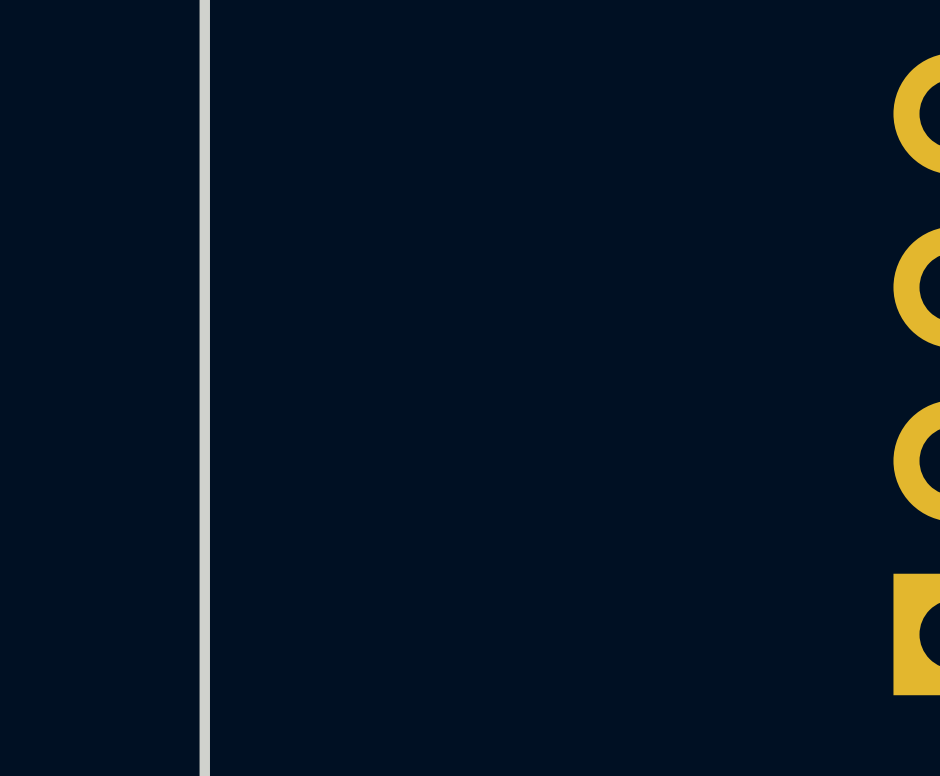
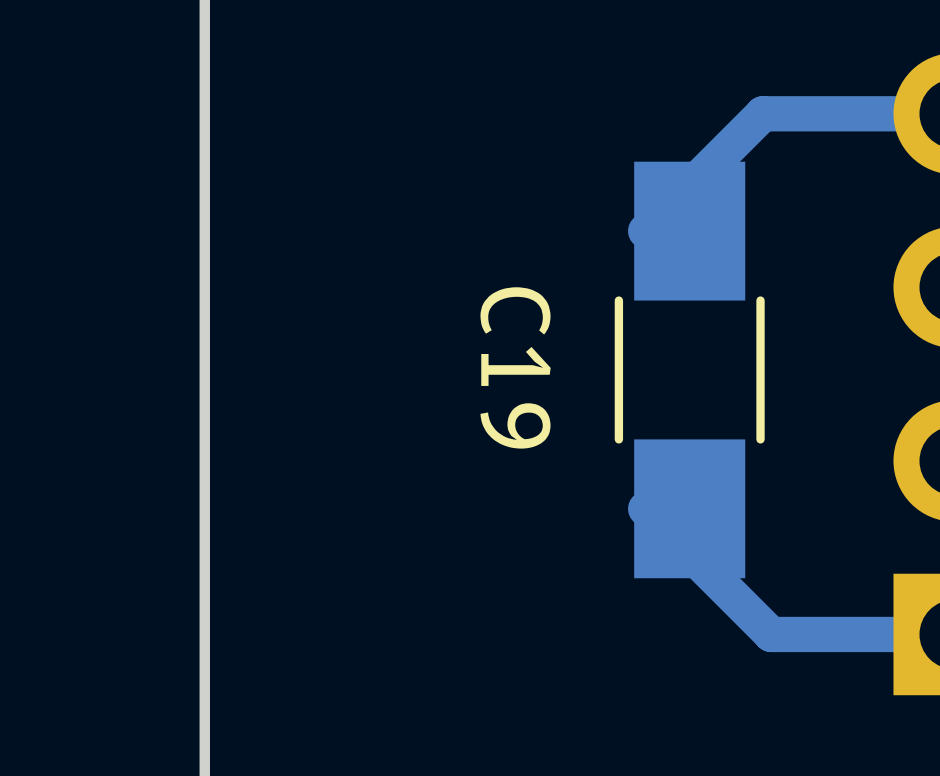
track: none -> (910, 113) (762, 113) (645, 231)
C19: none -> (689, 369)
track: none -> (645, 508) (771, 634) (910, 634)

